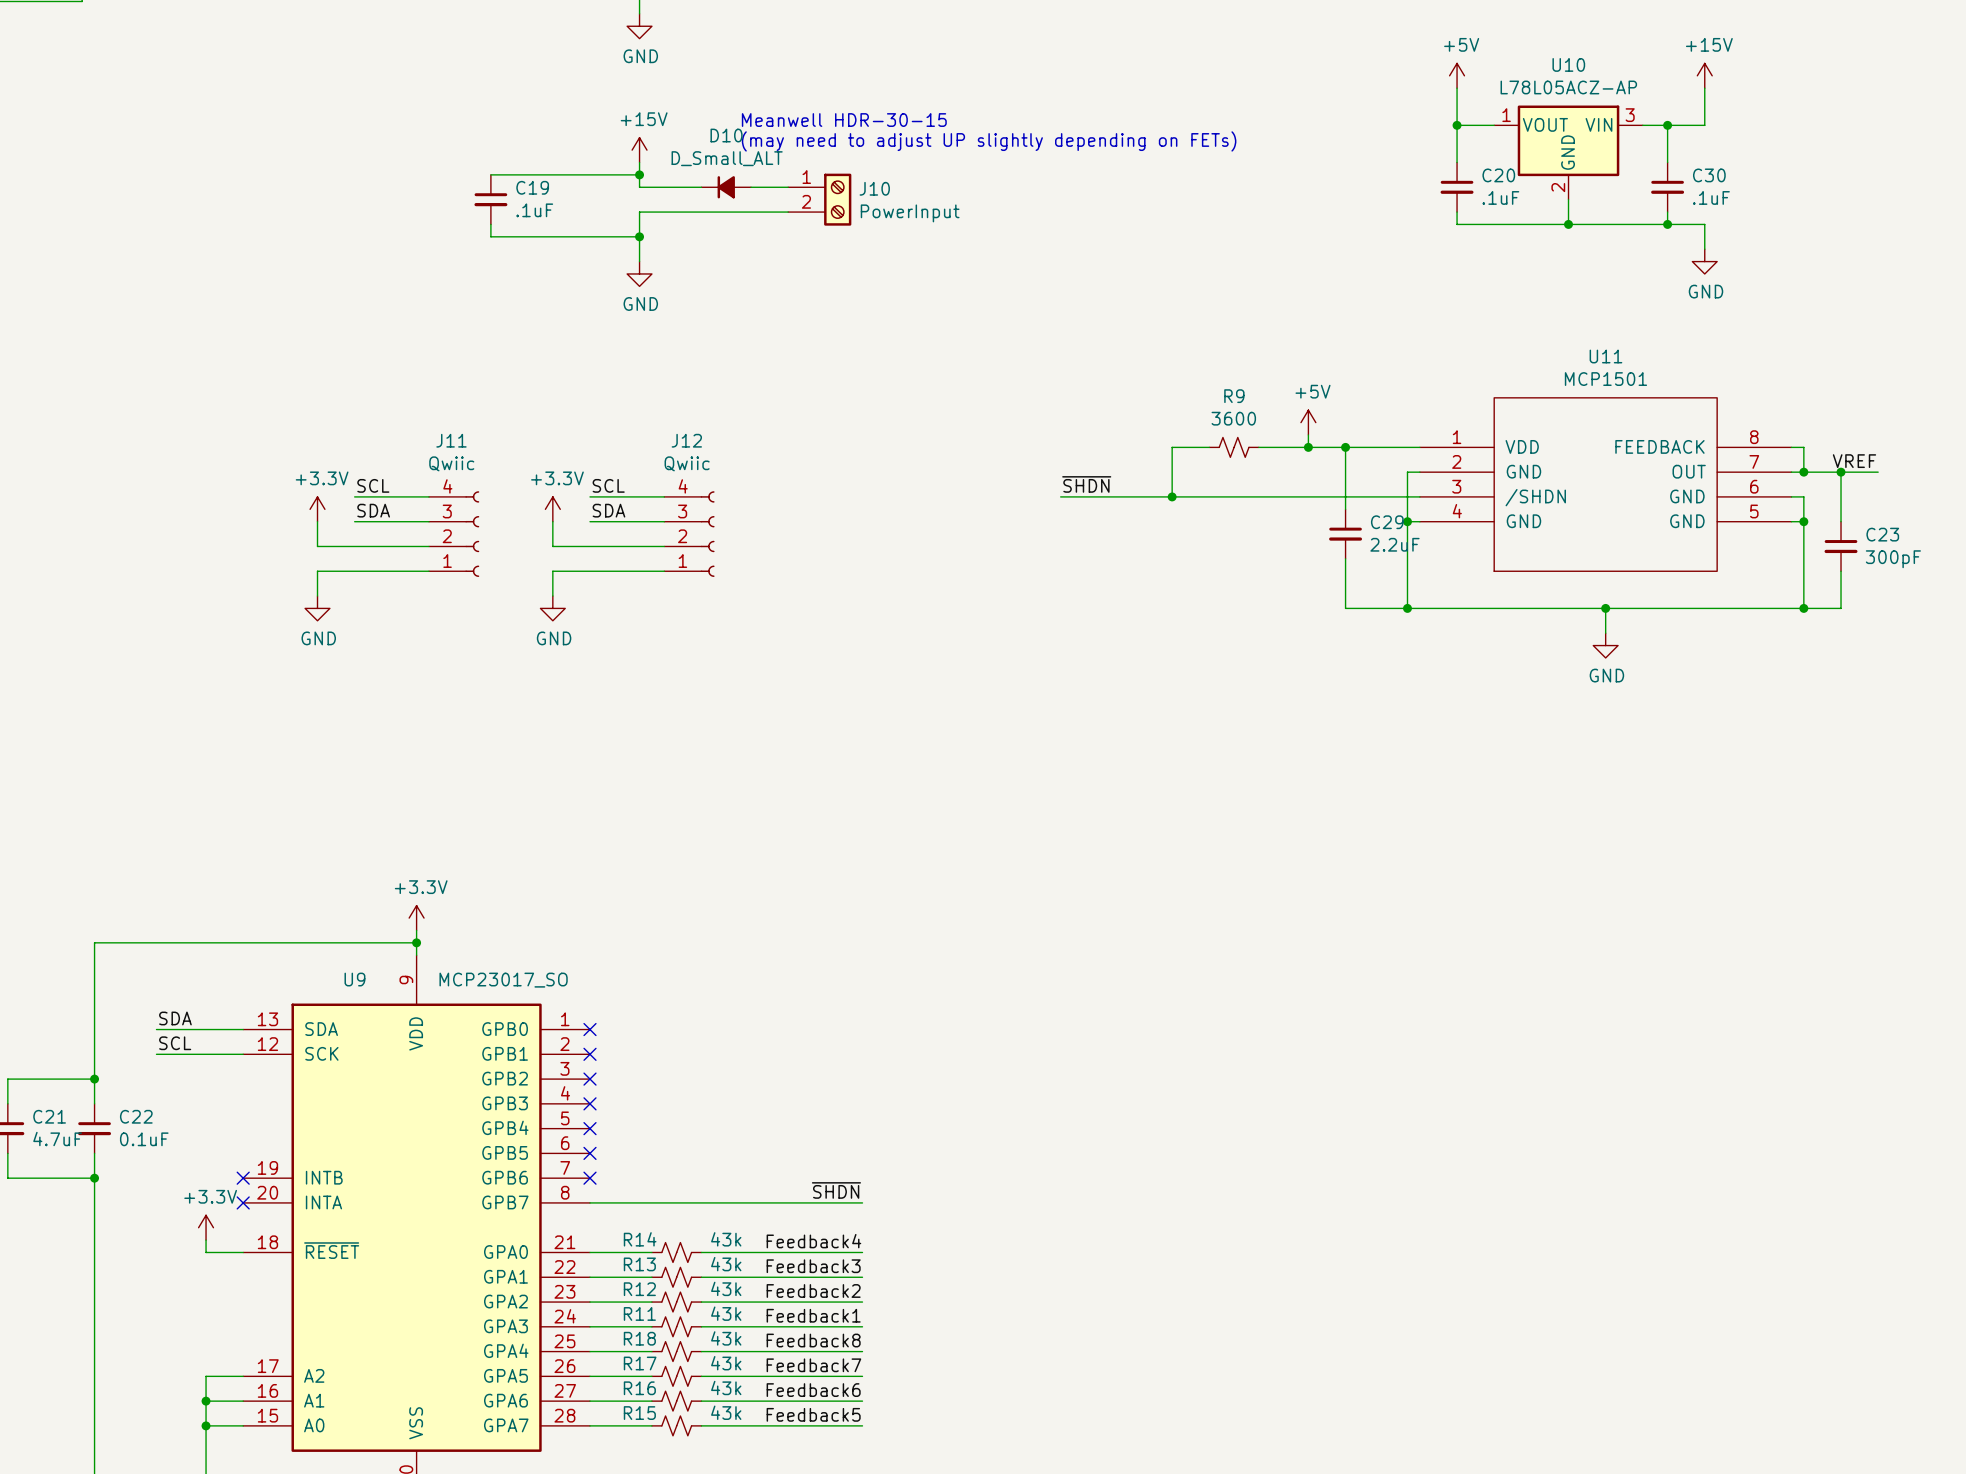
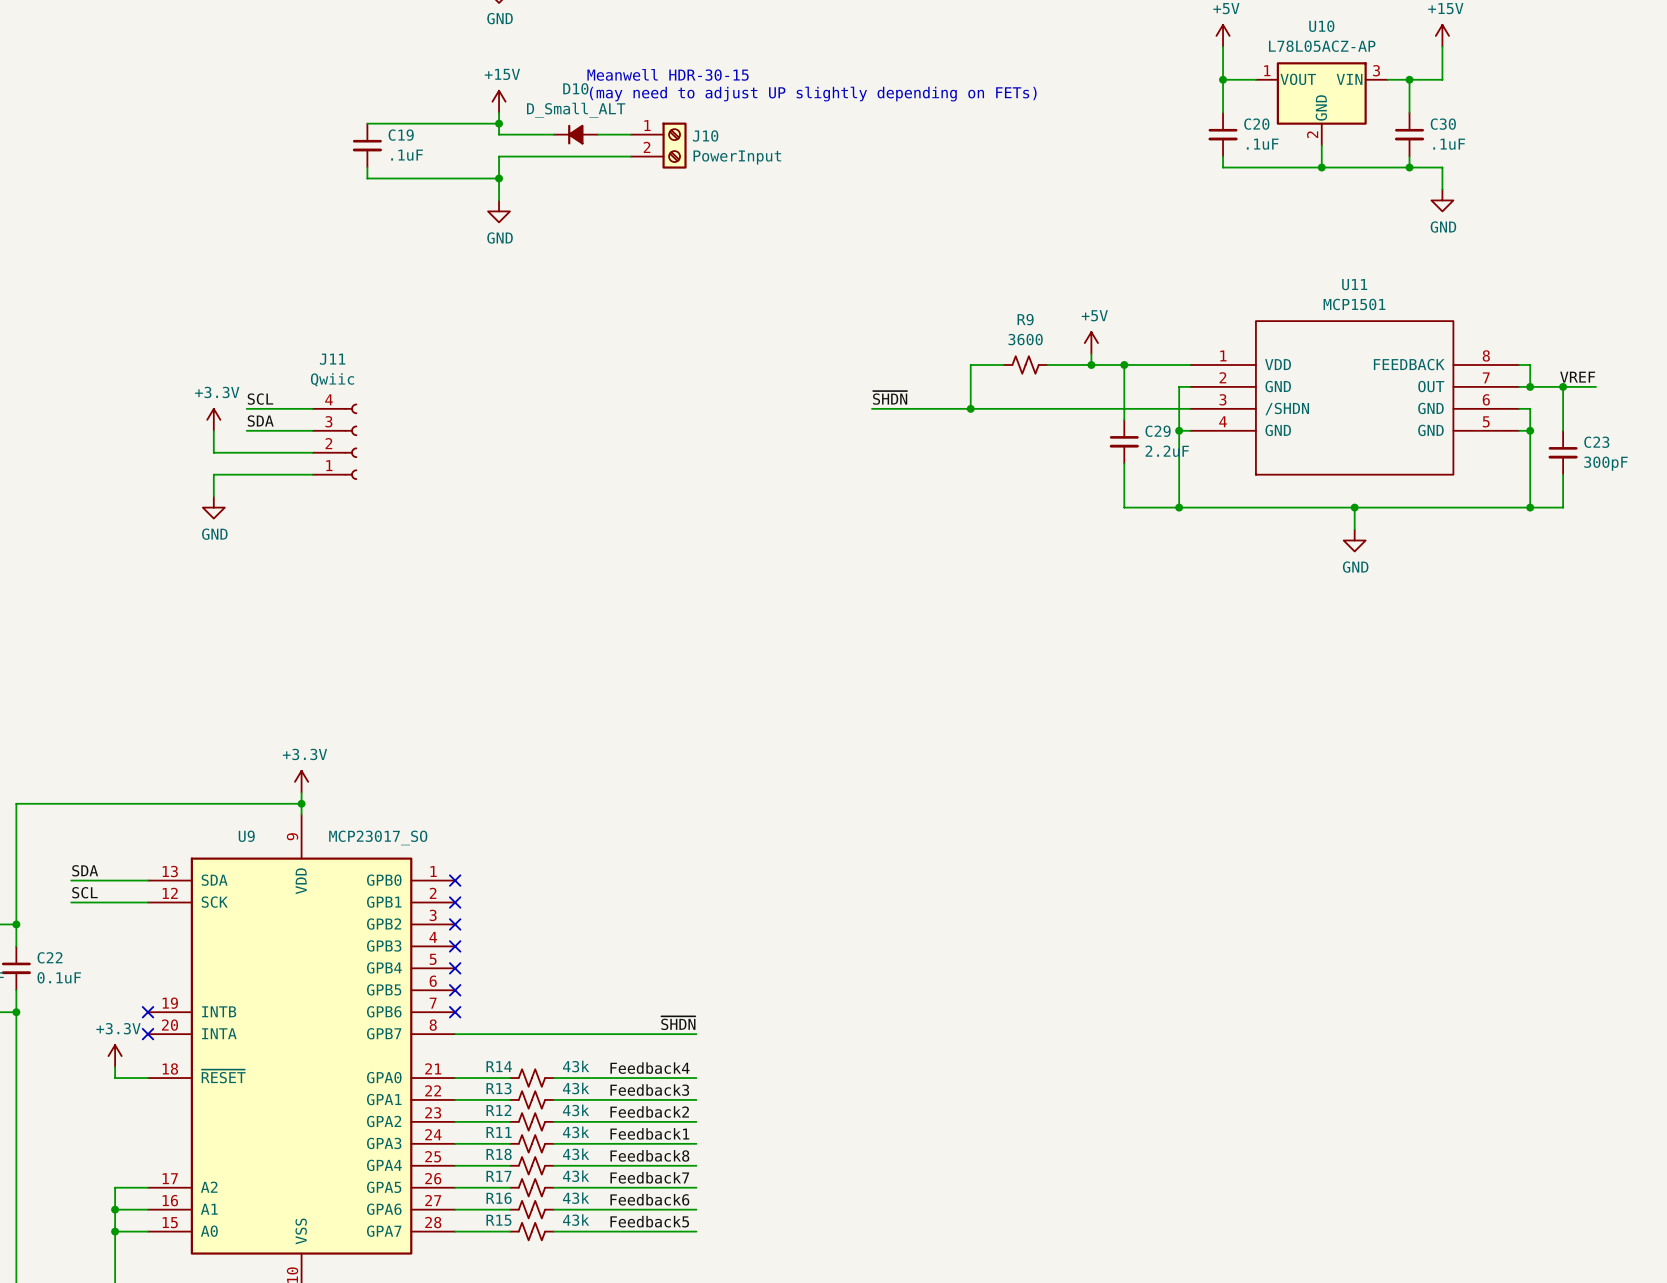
label: SCL (608, 485) -> none
wire: (590, 496) (664, 496) -> none
power symbol: +3.3V (552, 509) -> none
label: SDA (608, 510) -> none
wire: (552, 521) (552, 546) (664, 546) -> none
wire: (590, 521) (664, 521) -> none
J12: Qwiic (689, 534) -> none
wire: (664, 571) (552, 571) (552, 596) -> none
power symbol: GND (552, 608) -> none

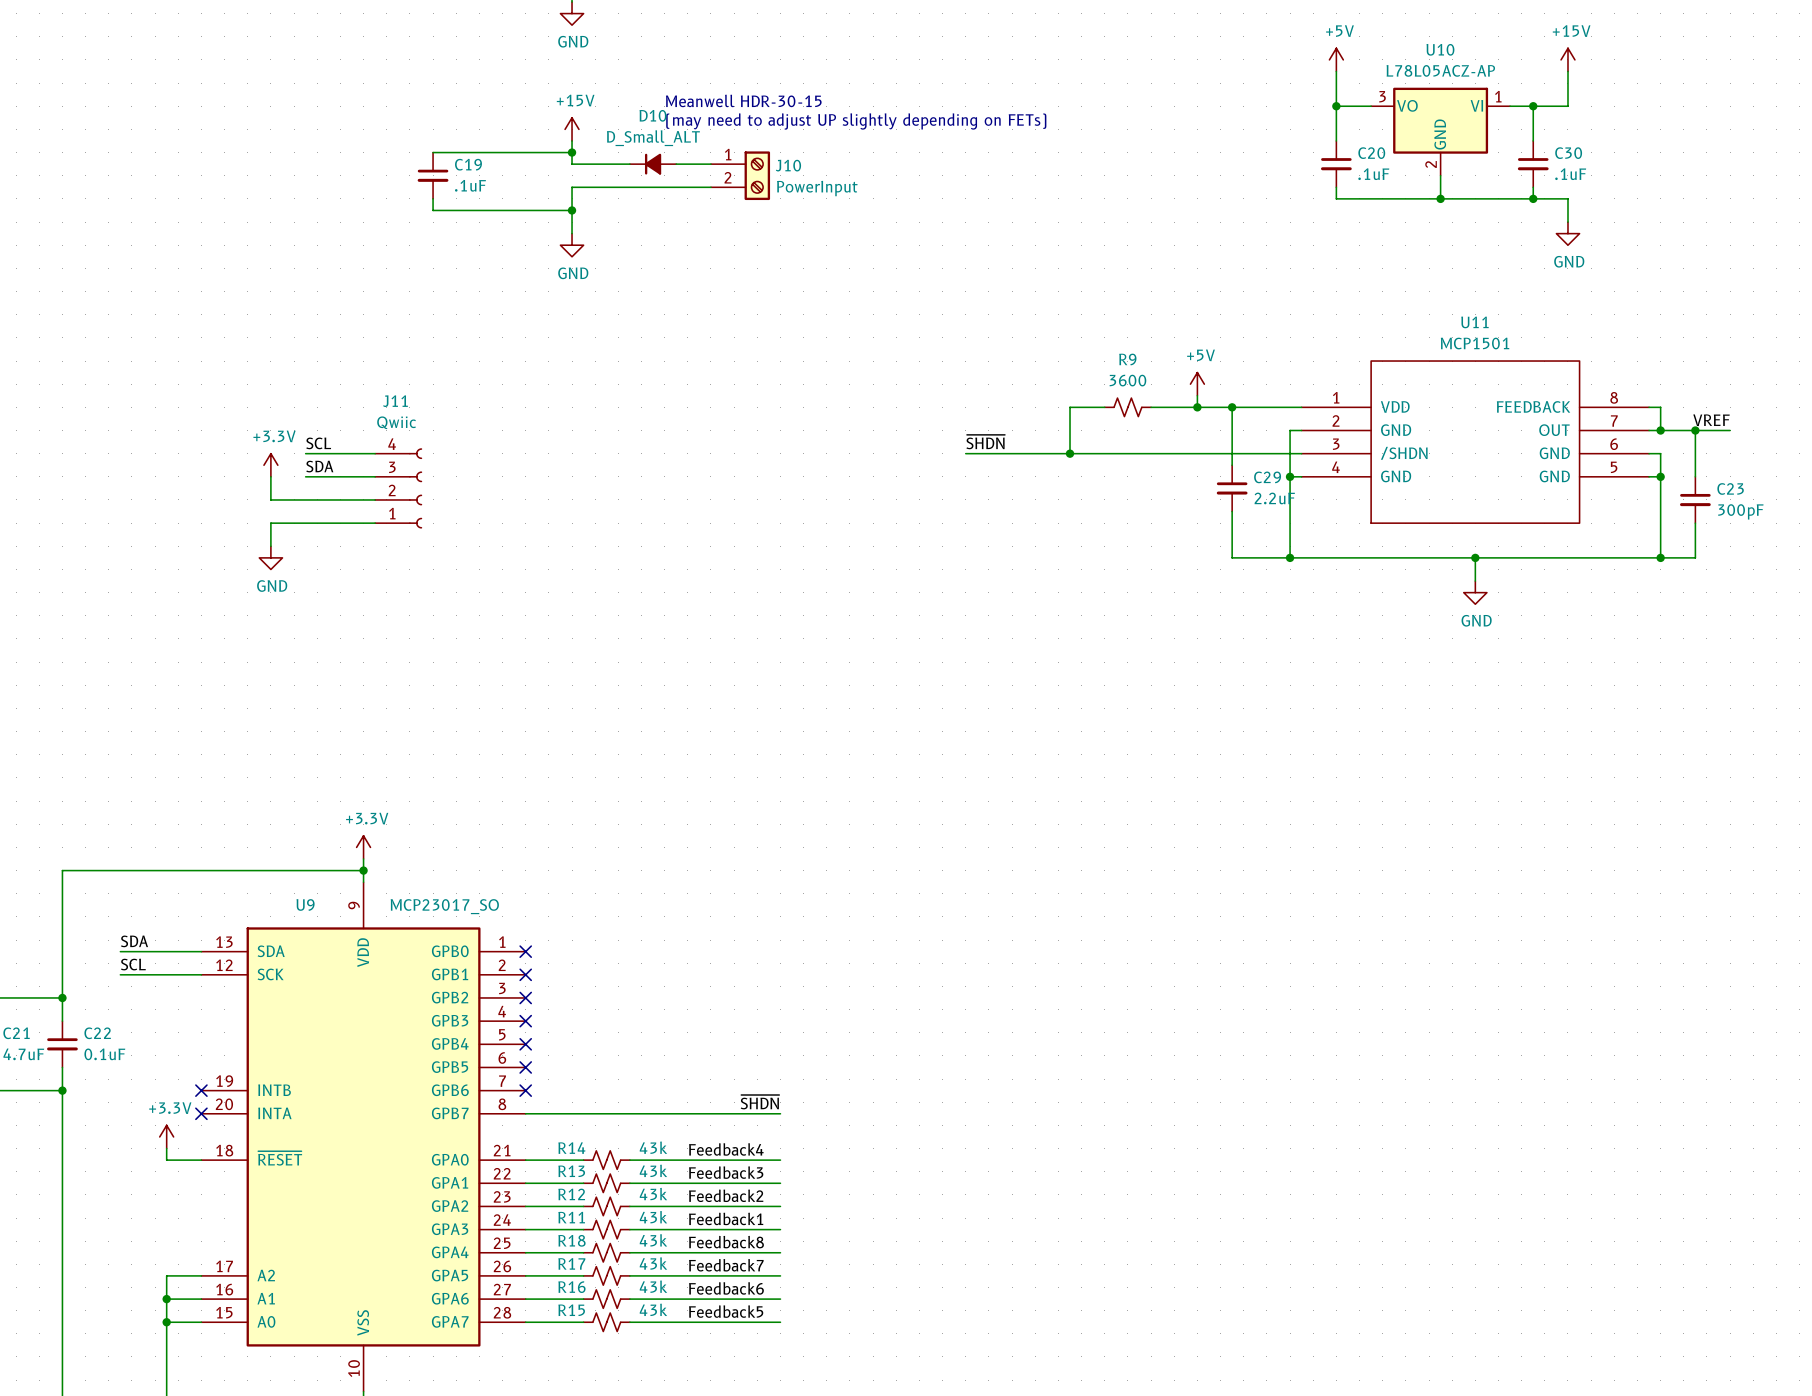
U10 pin number: 1 (1267, 70) -> 3 (1382, 96)
U10 pin number: 3 (1376, 70) -> 1 (1498, 96)
U10 pin name: VOUT (1298, 79) -> VO (1407, 105)
U10 pin name: VIN (1349, 79) -> VI (1476, 105)

